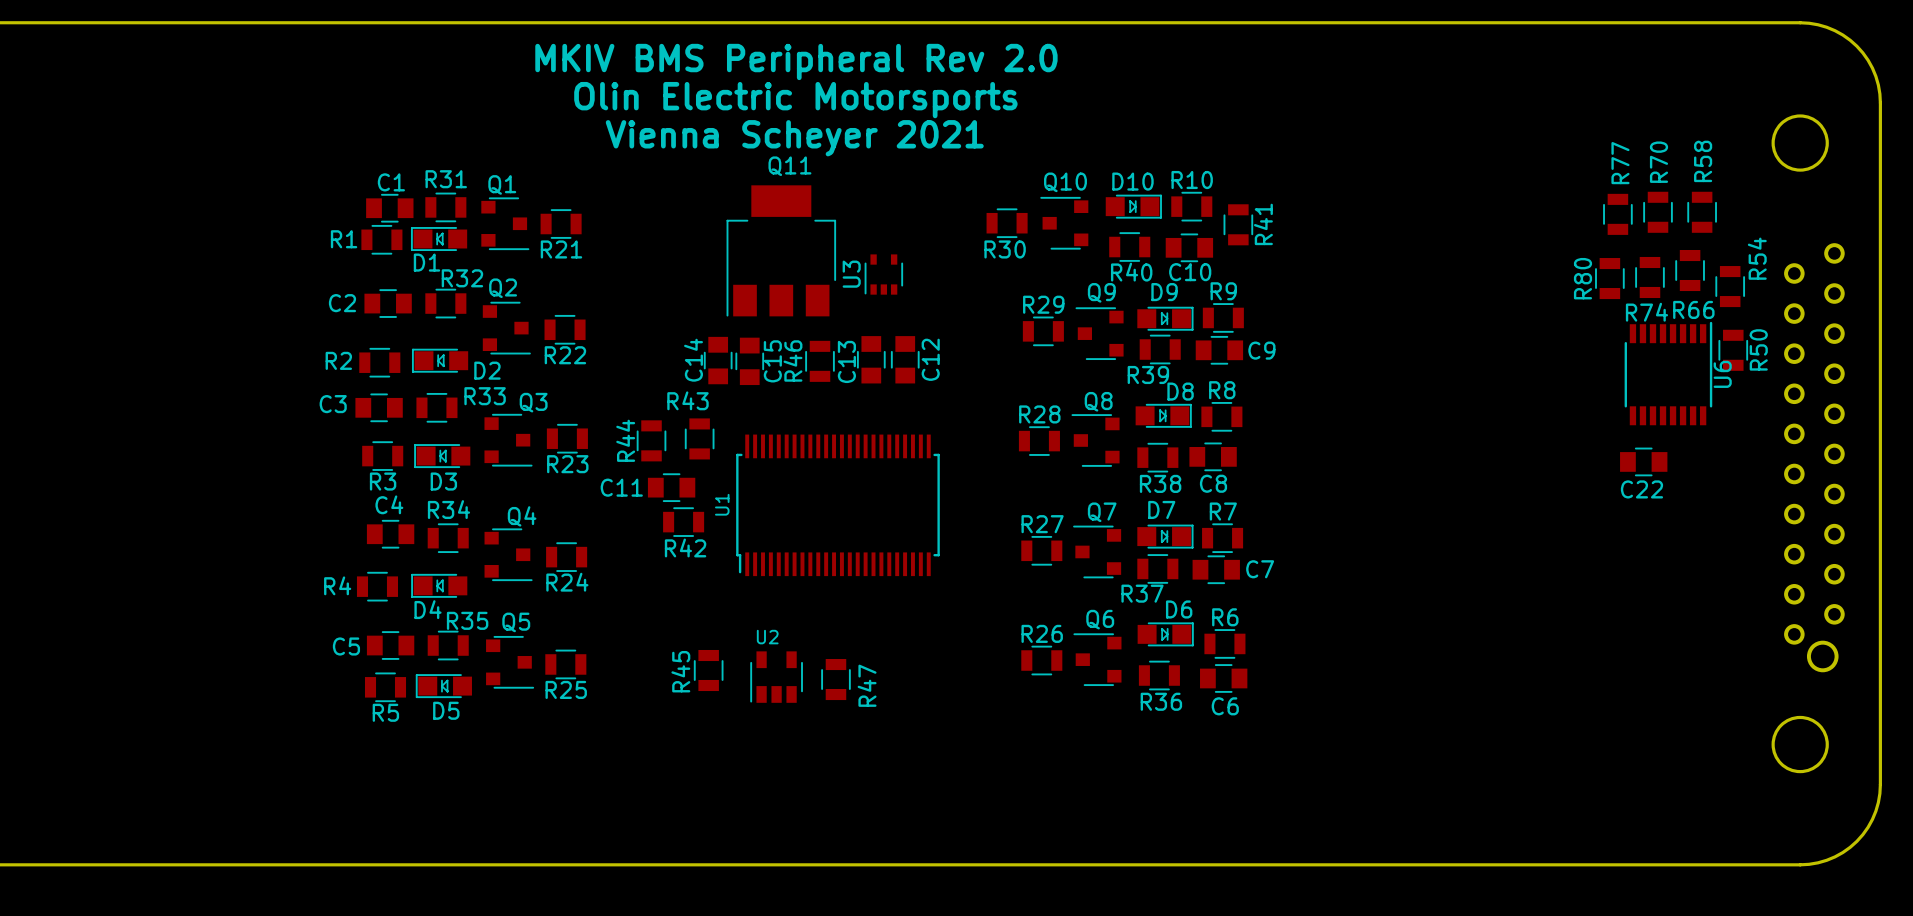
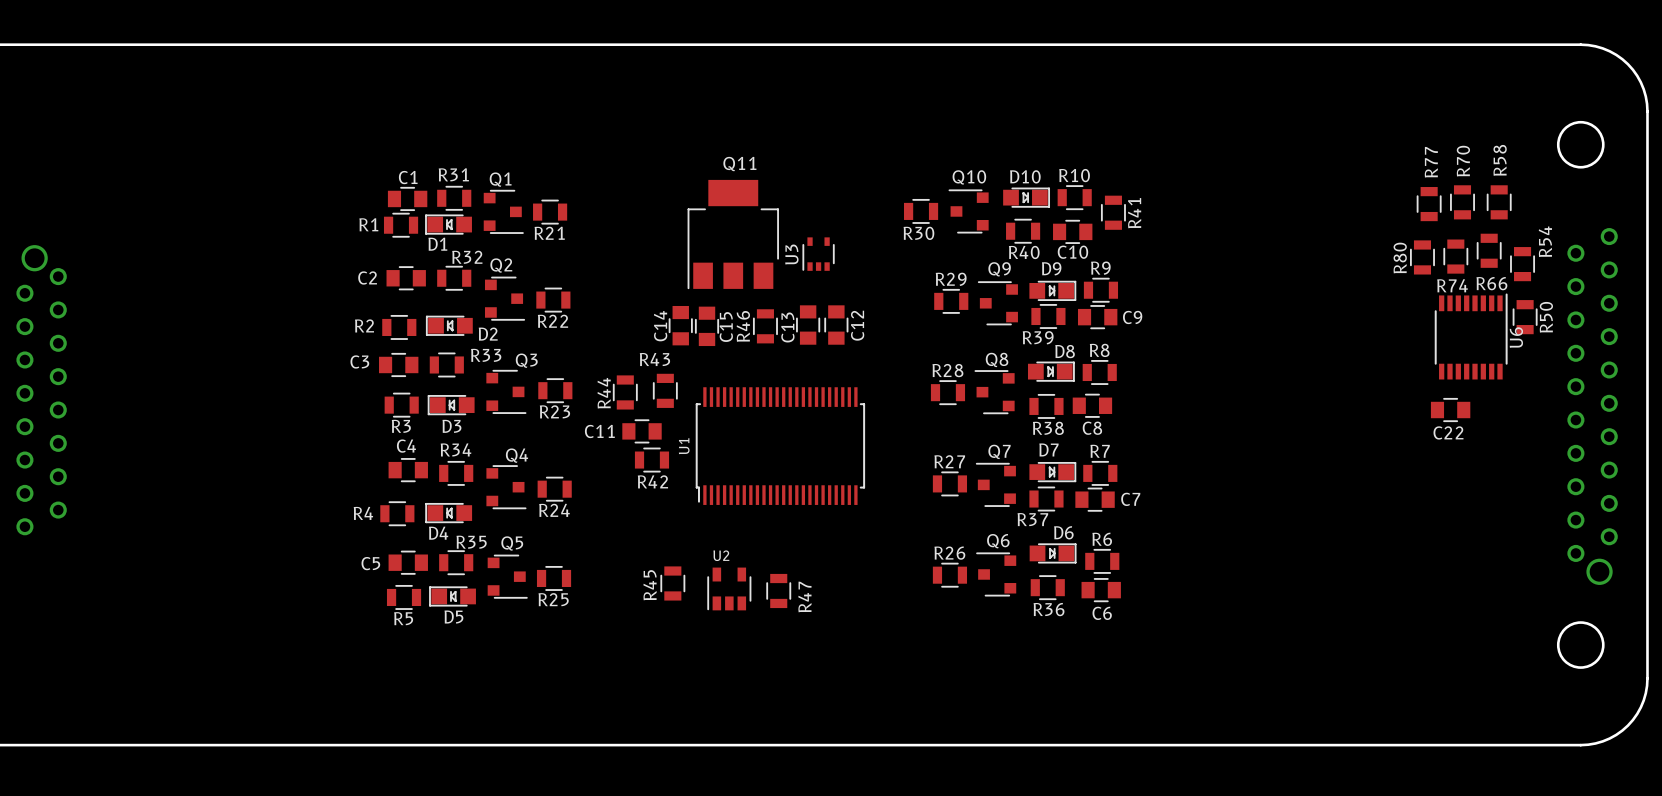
text: MKIV BMS Peripheral Rev 2.0 (796, 61) -> none
text: Olin Electric Motorsports (795, 100) -> none
text: Vienna Scheyer 2021 (794, 138) -> none

